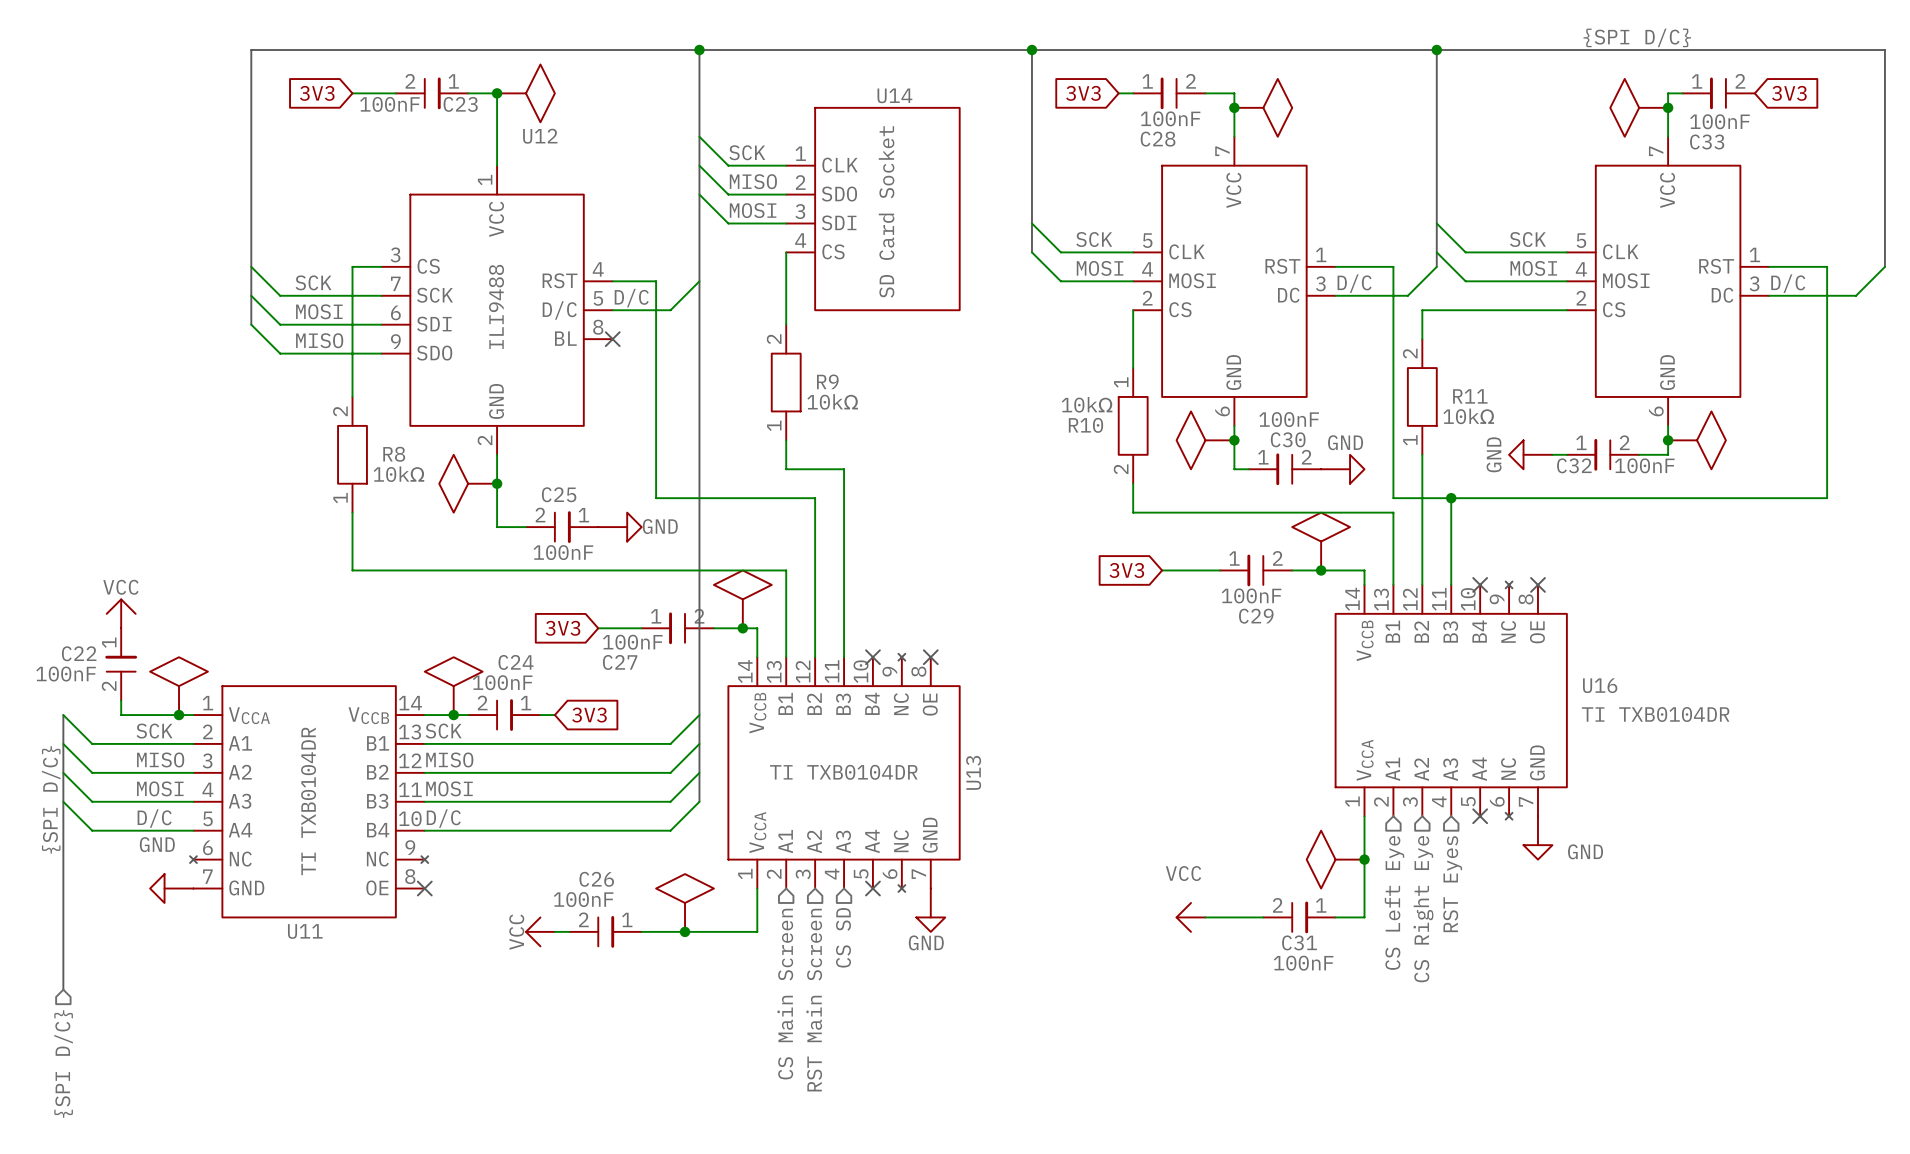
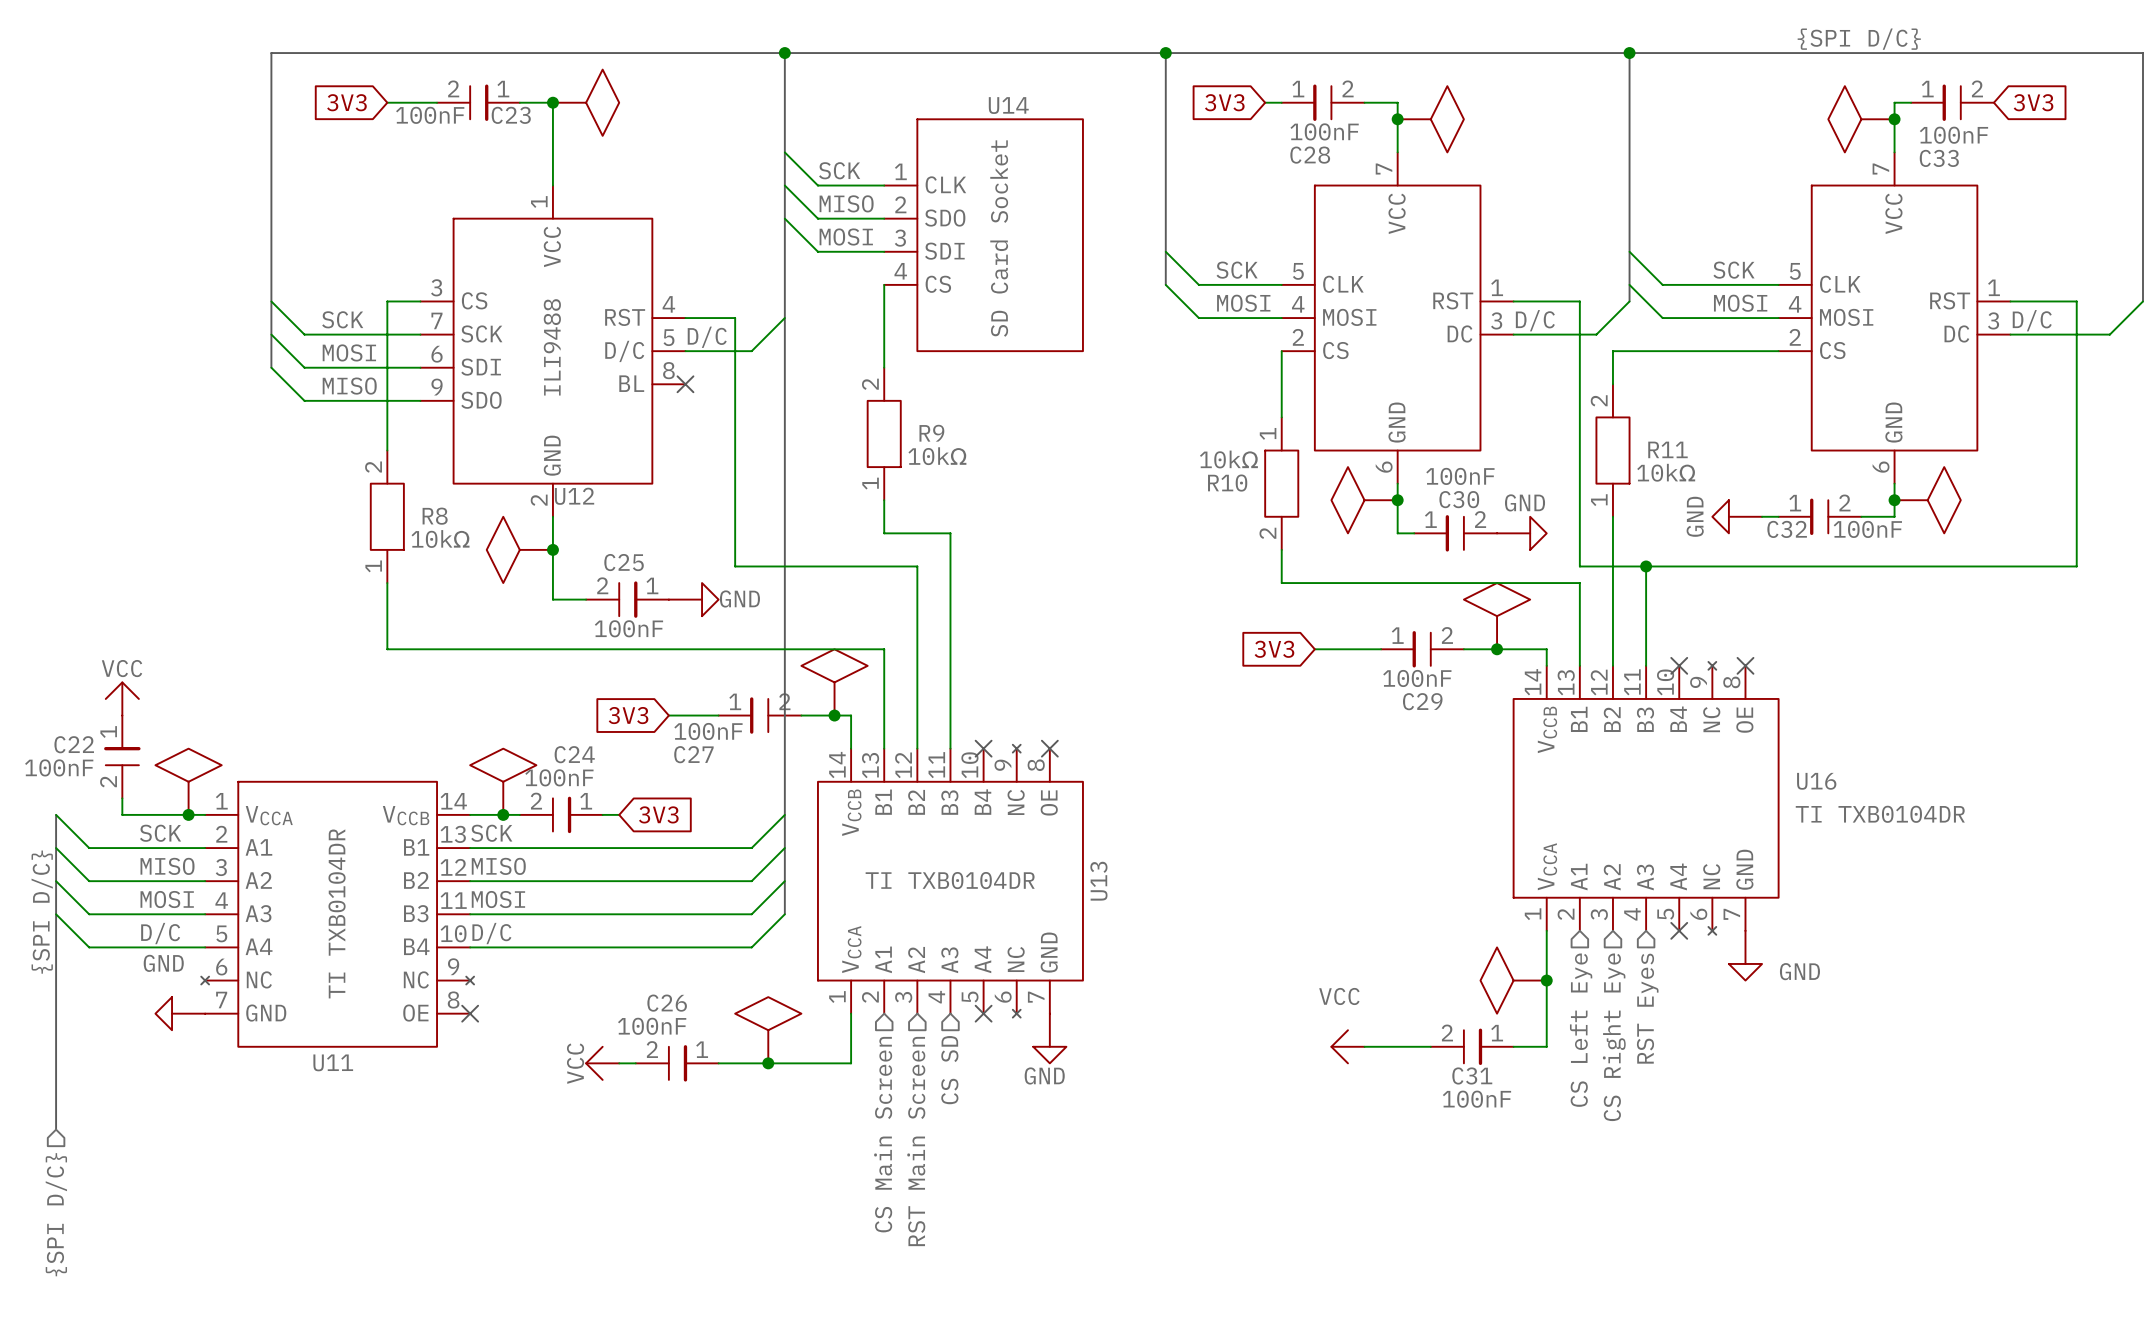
U12 name position: U12 (540, 136) -> U12 (574, 496)

